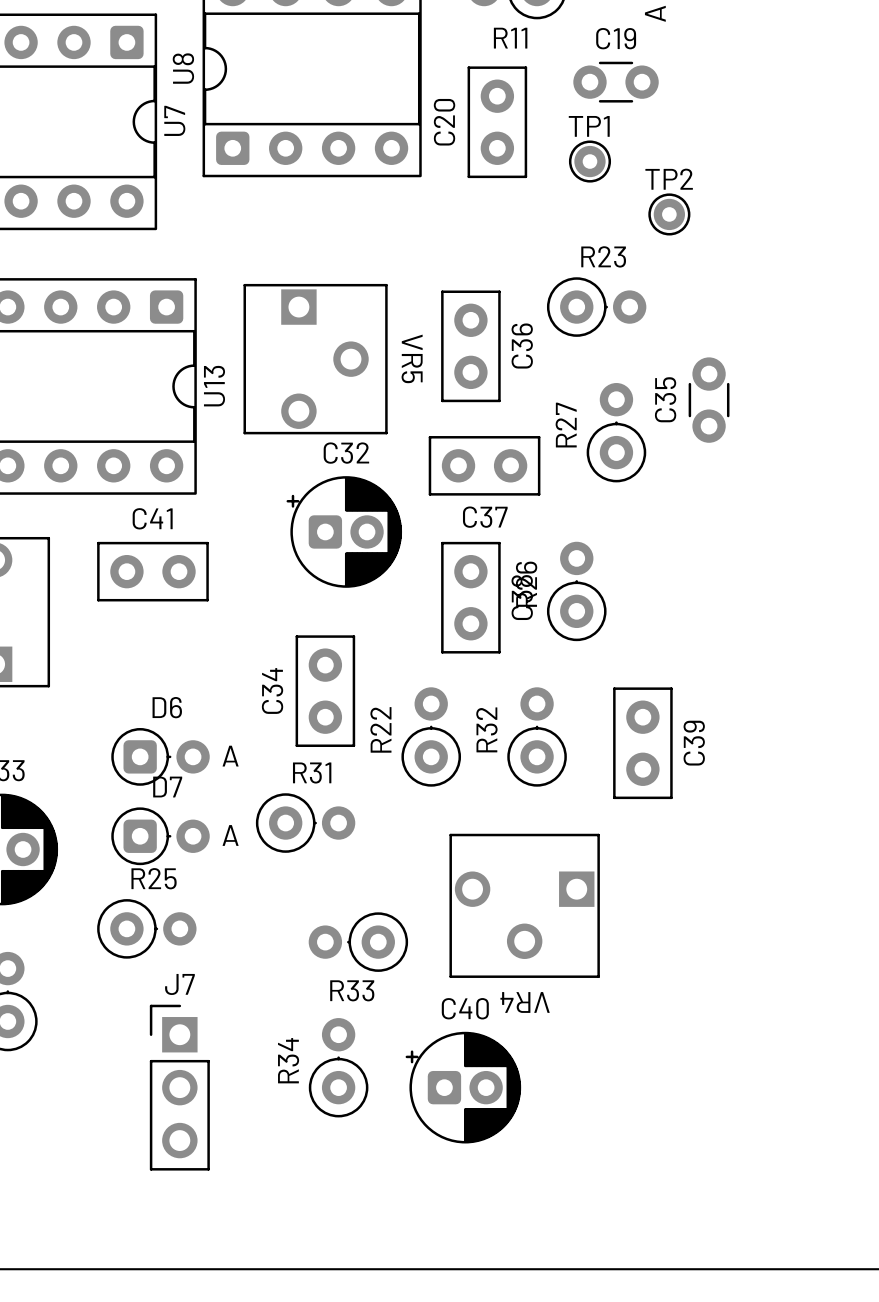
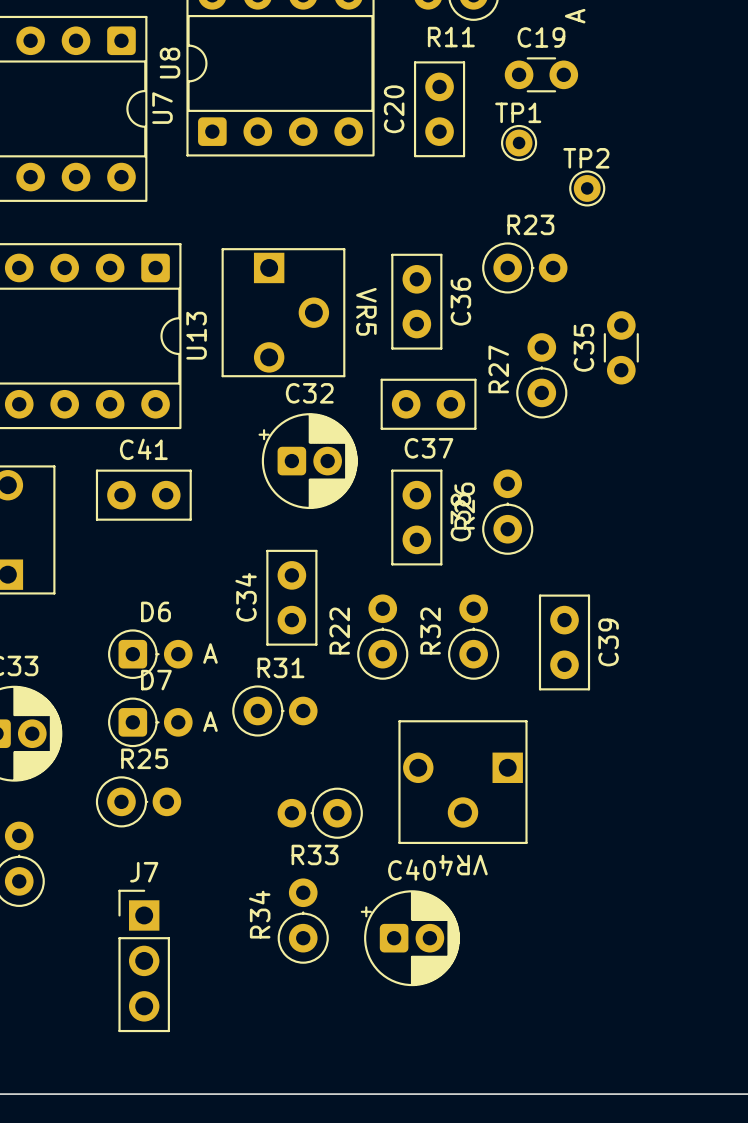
J7 position: (179, 1087) -> (144, 960)

